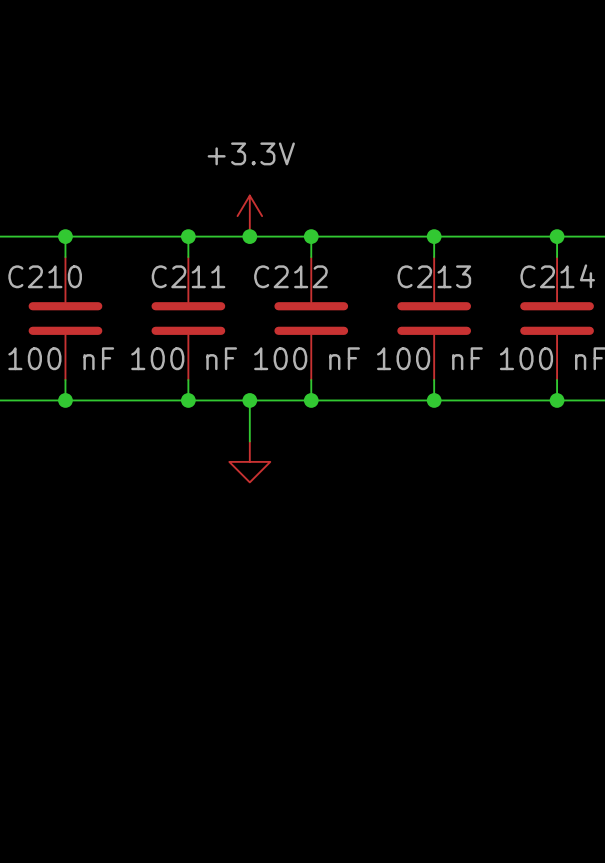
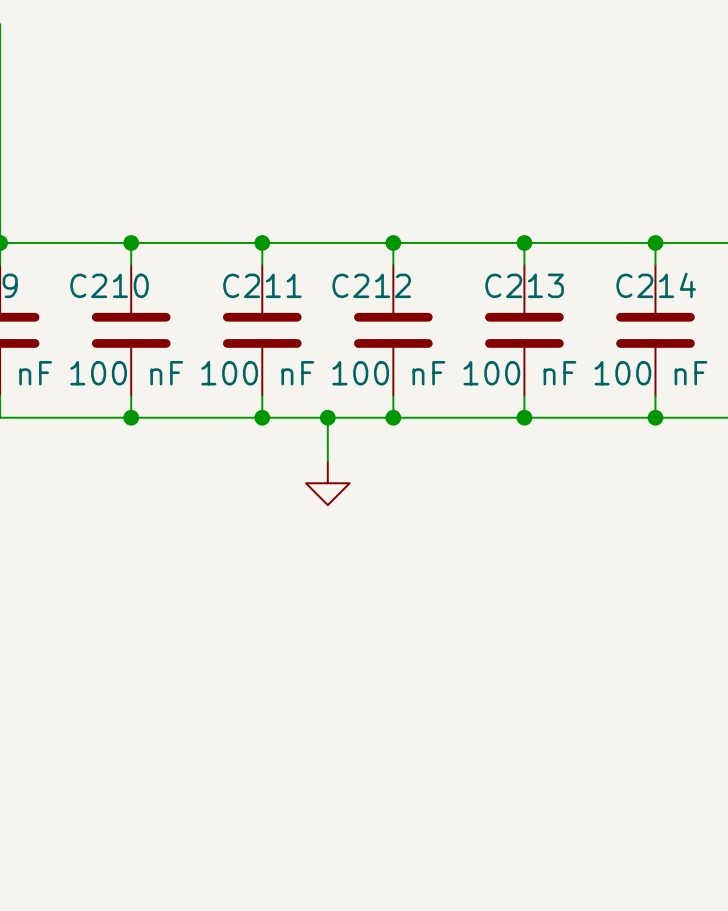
power symbol: +3.3V (249, 216) -> none
junction: (249, 236) -> none

